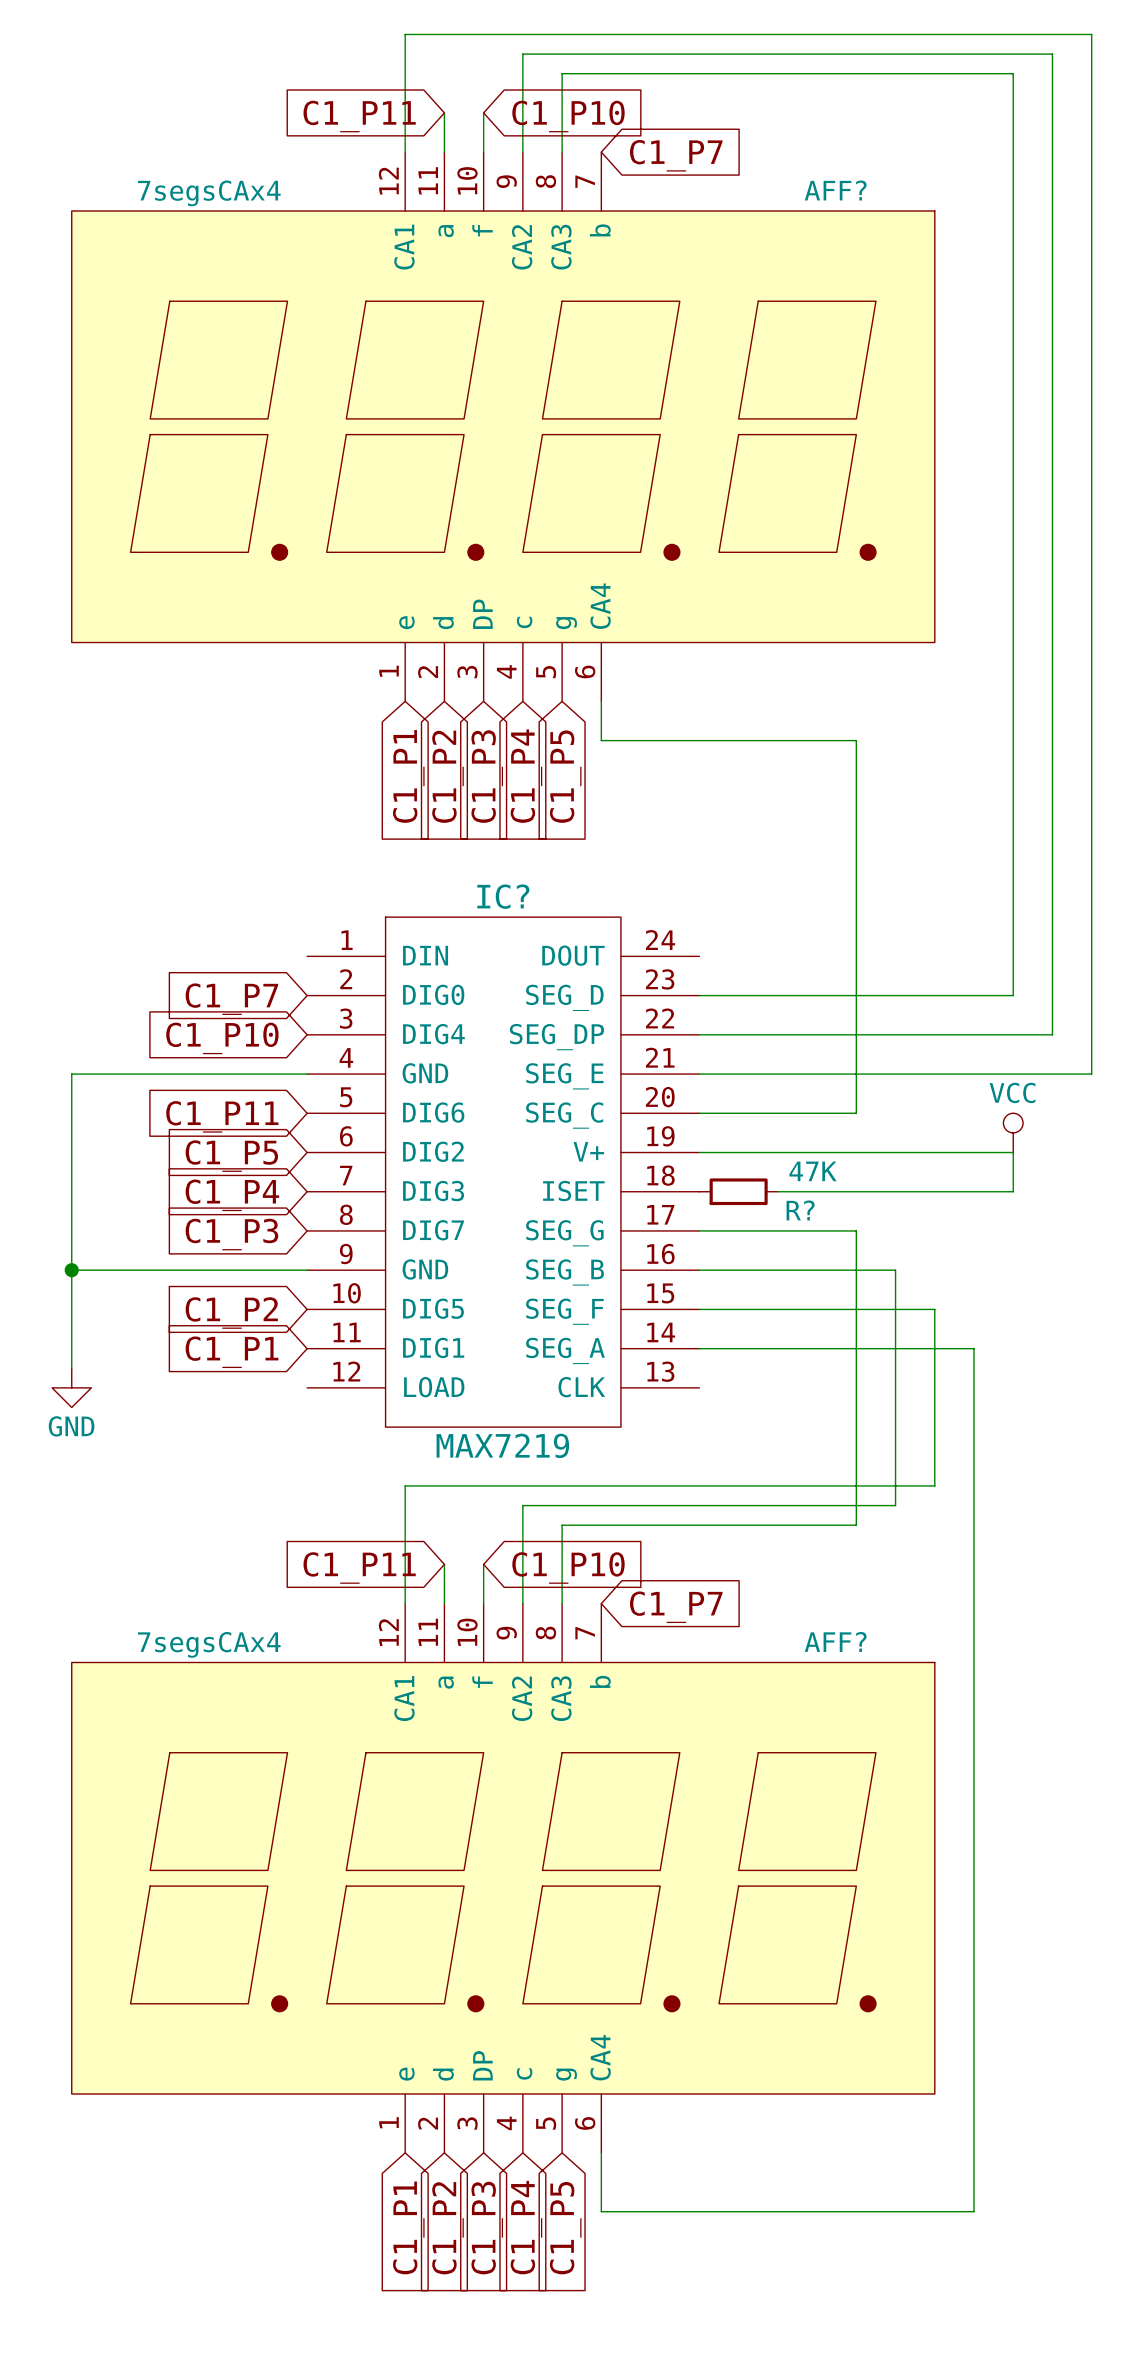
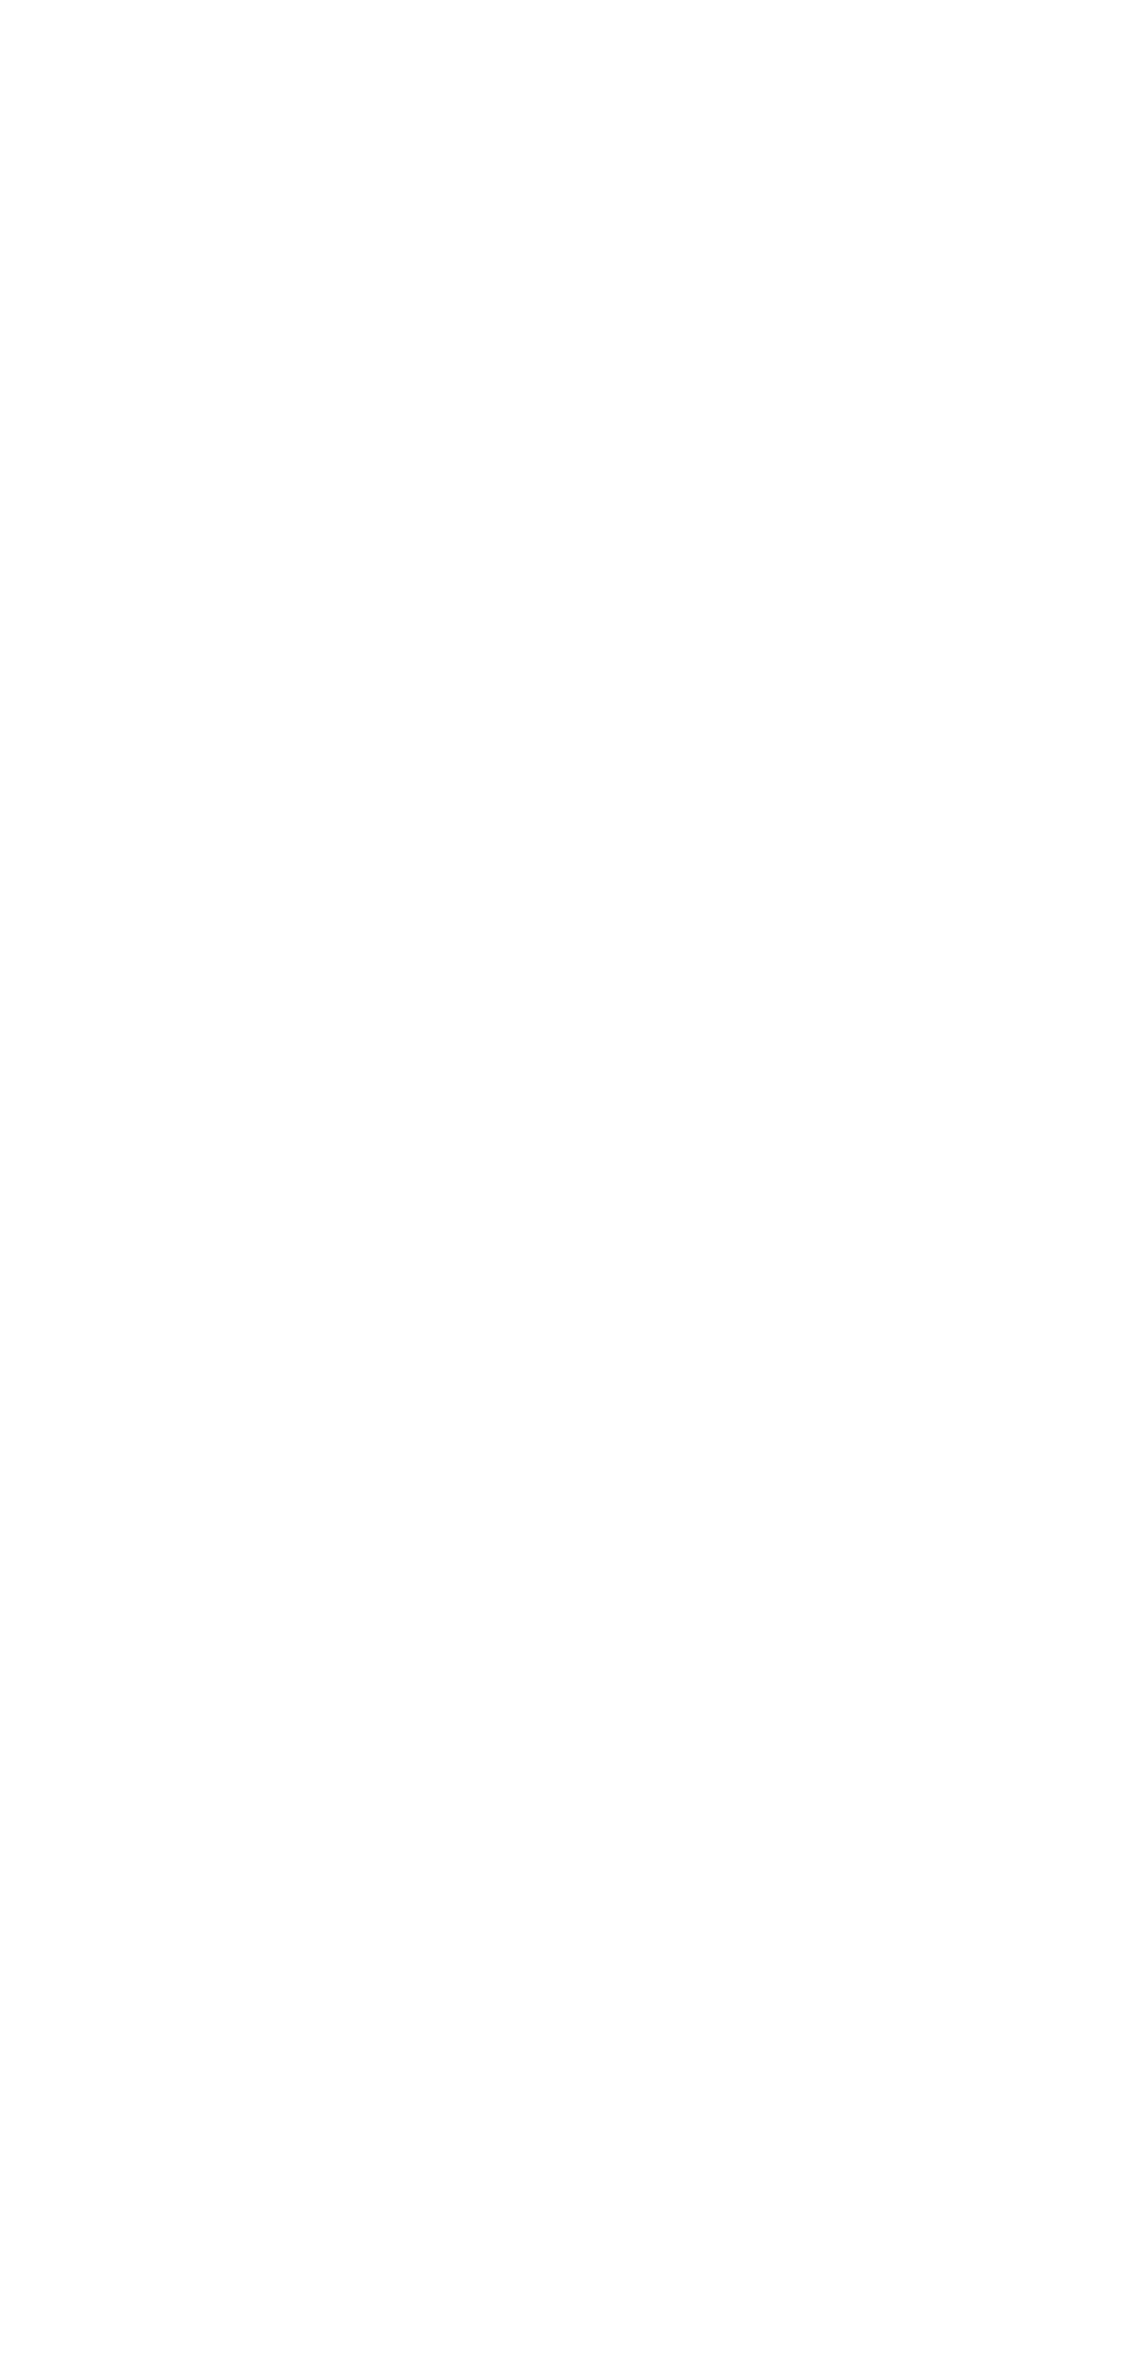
wire: (444, 112) (444, 152) -> none
wire: (483, 112) (483, 152) -> none
global label: C1_P11 (359, 116) -> none
global label: C1_P10 (568, 116) -> none
wire: (405, 152) (405, 34) (1091, 34) (1091, 1074) (699, 1074) -> none
wire: (522, 152) (522, 54) (1052, 54) (1052, 1034) (699, 1034) -> none
wire: (562, 152) (562, 73) (1013, 73) (1013, 995) (699, 995) -> none
global label: C1_P7 (676, 155) -> none
AFF?: 7segsCAx4 (503, 426) -> none
wire: (601, 701) (601, 740) (856, 740) (856, 1113) (699, 1113) -> none
global label: C1_P1 (408, 776) -> none
global label: C1_P2 (448, 776) -> none
global label: C1_P3 (487, 776) -> none
global label: C1_P4 (526, 776) -> none
global label: C1_P5 (565, 776) -> none
global label: C1_P7 (231, 999) -> none
global label: C1_P10 (222, 1038) -> none
wire: (307, 1074) (71, 1074) (71, 1368) -> none
global label: C1_P11 (222, 1116) -> none
power symbol: VCC (1013, 1132) -> none
wire: (699, 1152) (1013, 1152) (1013, 1191) (777, 1191) -> none
global label: C1_P5 (231, 1156) -> none
IC?: MAX7219 (503, 1172) -> none
R?: 47K (738, 1191) -> none
global label: C1_P4 (232, 1195) -> none
wire: (699, 1230) (856, 1230) (856, 1525) (562, 1525) (562, 1603) -> none
global label: C1_P3 (231, 1234) -> none
wire: (71, 1270) (307, 1270) -> none
junction: (71, 1270) -> none
wire: (699, 1270) (895, 1270) (895, 1505) (522, 1505) (522, 1603) -> none
wire: (699, 1309) (934, 1309) (934, 1485) (405, 1485) (405, 1603) -> none
global label: C1_P2 (231, 1313) -> none
wire: (699, 1348) (974, 1348) (974, 2211) (601, 2211) (601, 2152) -> none
global label: C1_P1 (232, 1352) -> none
power symbol: GND (71, 1387) -> none
wire: (444, 1564) (444, 1603) -> none
wire: (483, 1564) (483, 1603) -> none
global label: C1_P11 (359, 1568) -> none
global label: C1_P10 (568, 1568) -> none
global label: C1_P7 (676, 1607) -> none
AFF?: 7segsCAx4 (503, 1878) -> none
global label: C1_P1 (408, 2227) -> none
global label: C1_P4 (526, 2227) -> none
global label: C1_P2 (448, 2228) -> none
global label: C1_P3 (487, 2228) -> none
global label: C1_P5 (565, 2228) -> none

